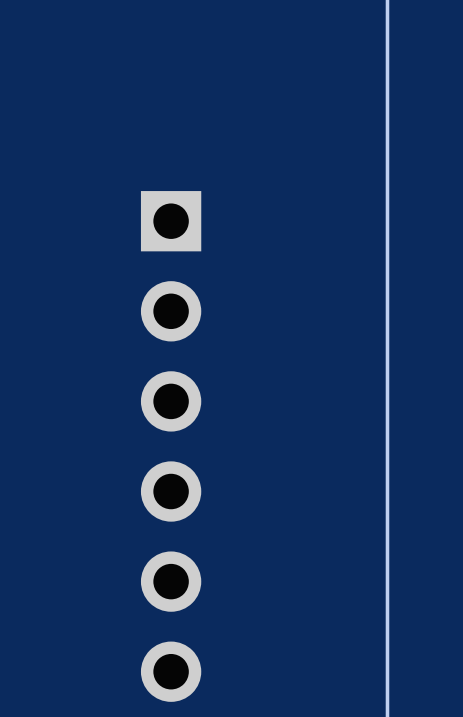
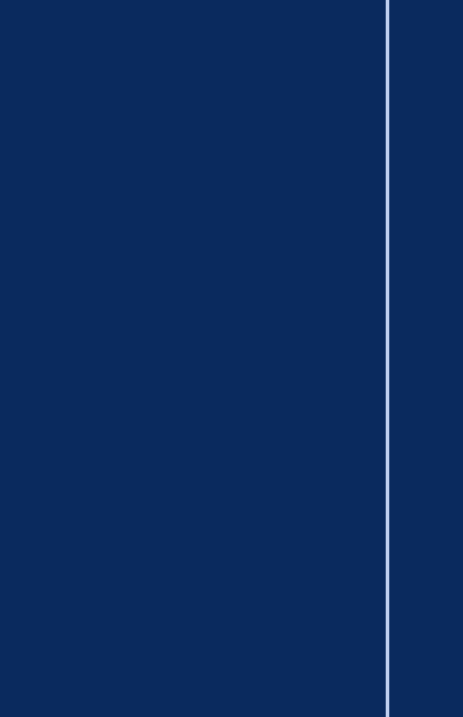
part: (171, 446) -> none

